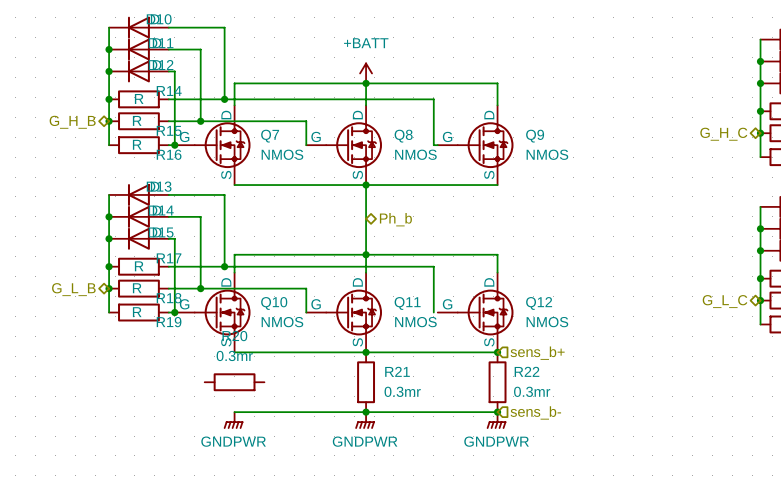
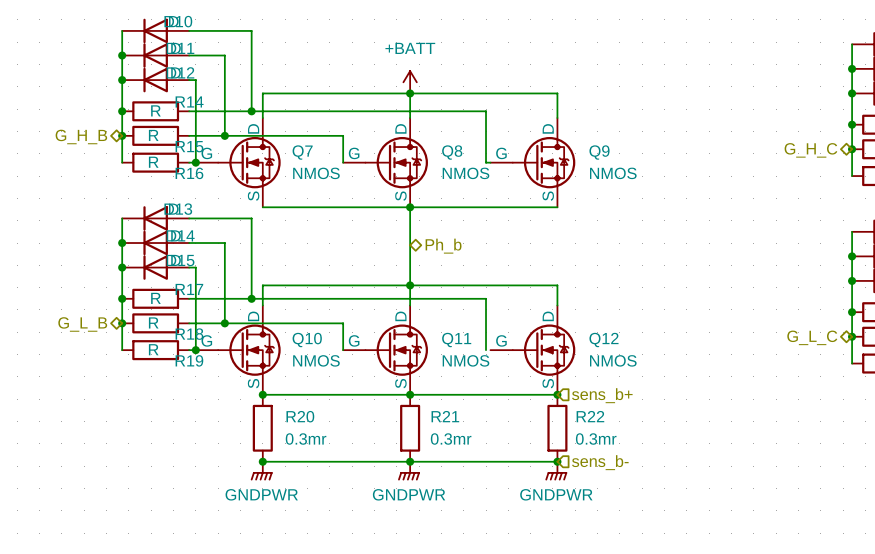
junction: none -> (262, 394)
R20 value position: 0.3mr (234, 355) -> 0.3mr (306, 439)
R20 rotation: 0° (234, 382) -> 90° clockwise (262, 428)
junction: none -> (262, 461)

